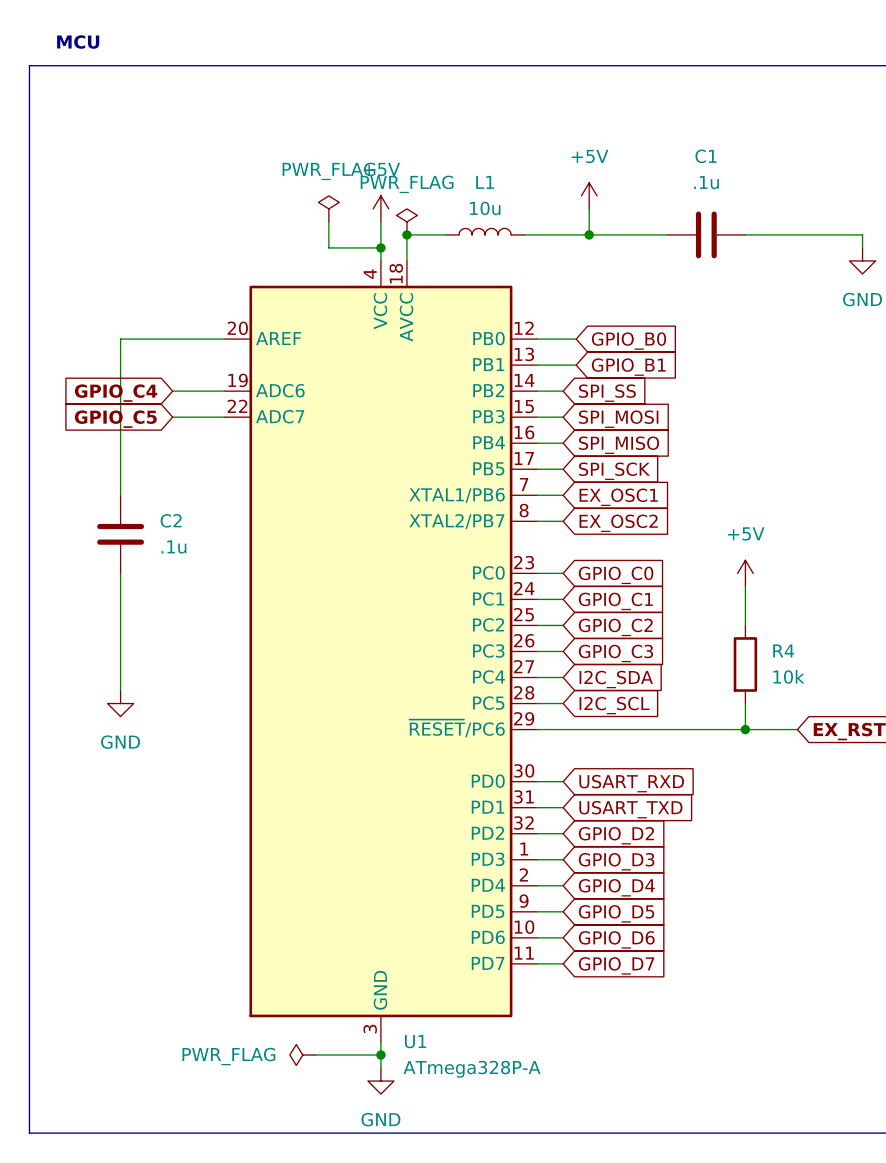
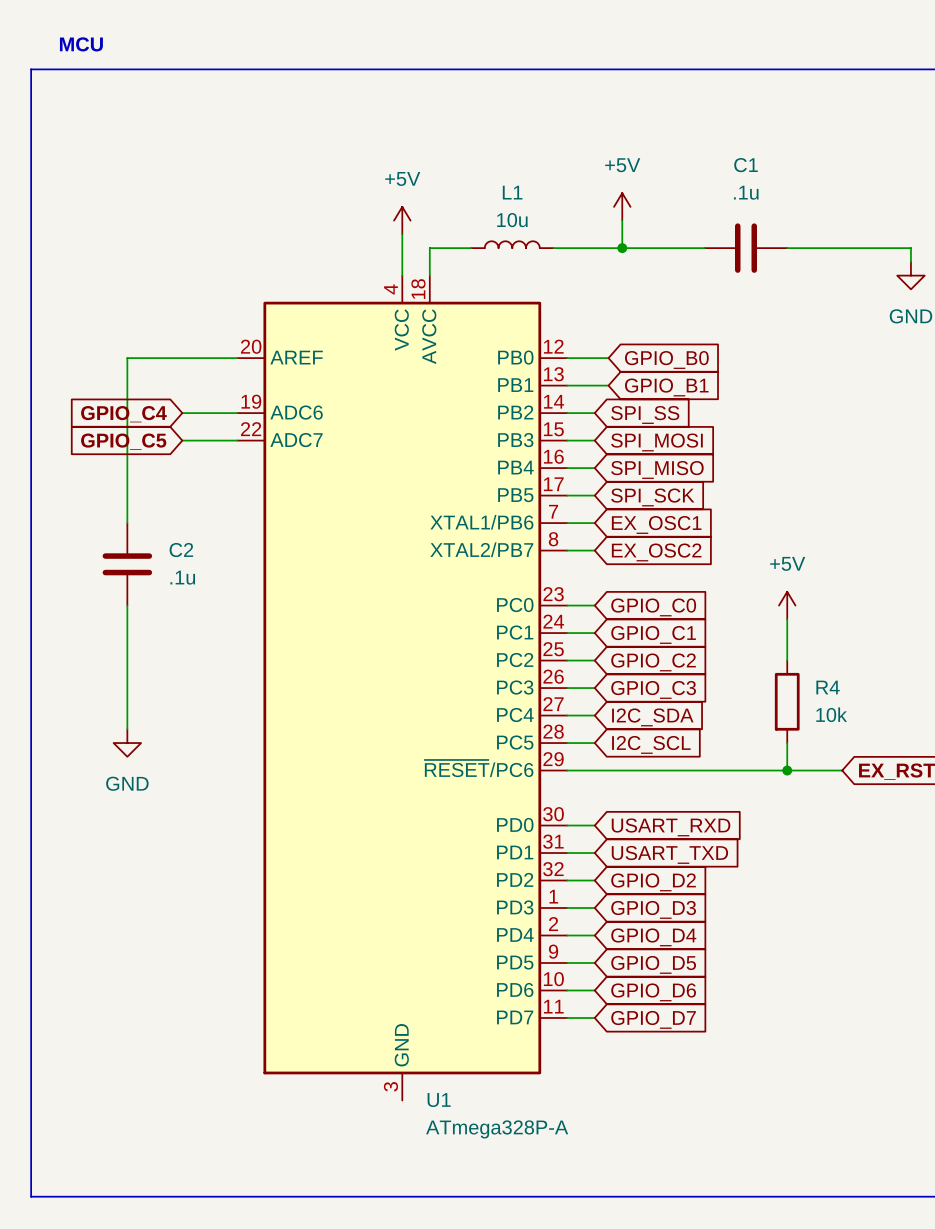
power symbol: PWR_FLAG (328, 208) -> none
wire: (328, 221) (328, 247) (380, 247) -> none
power symbol: PWR_FLAG (406, 221) -> none
junction: (406, 234) -> none
junction: (380, 247) -> none
wire: (380, 1041) (380, 1068) -> none
power symbol: PWR_FLAG (302, 1055) -> none
wire: (315, 1055) (380, 1055) -> none
junction: (380, 1055) -> none
power symbol: GND (380, 1081) -> none

